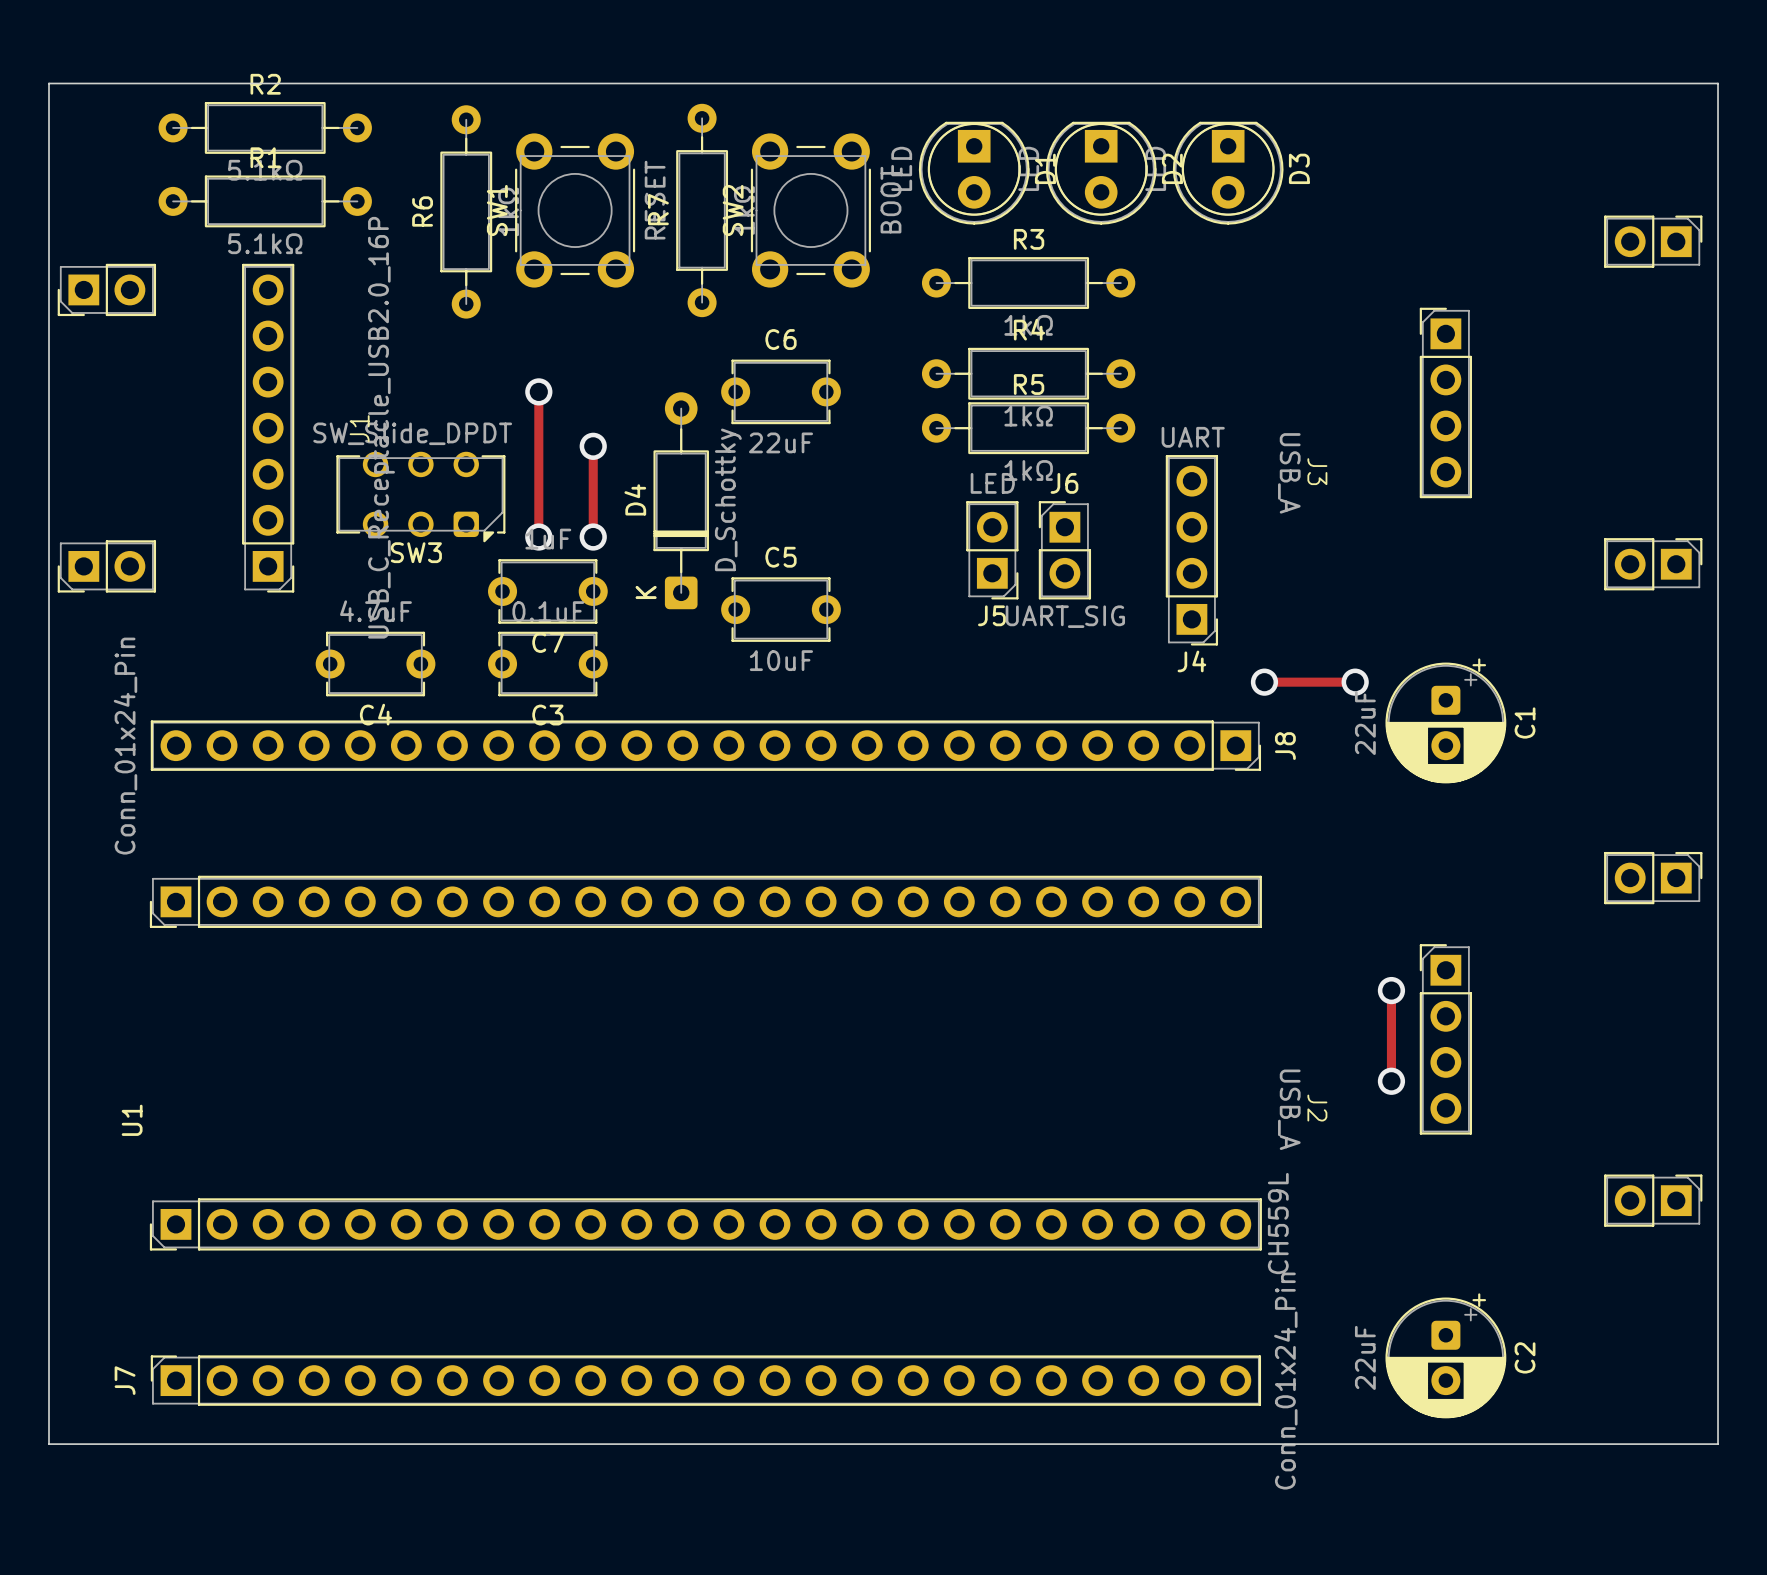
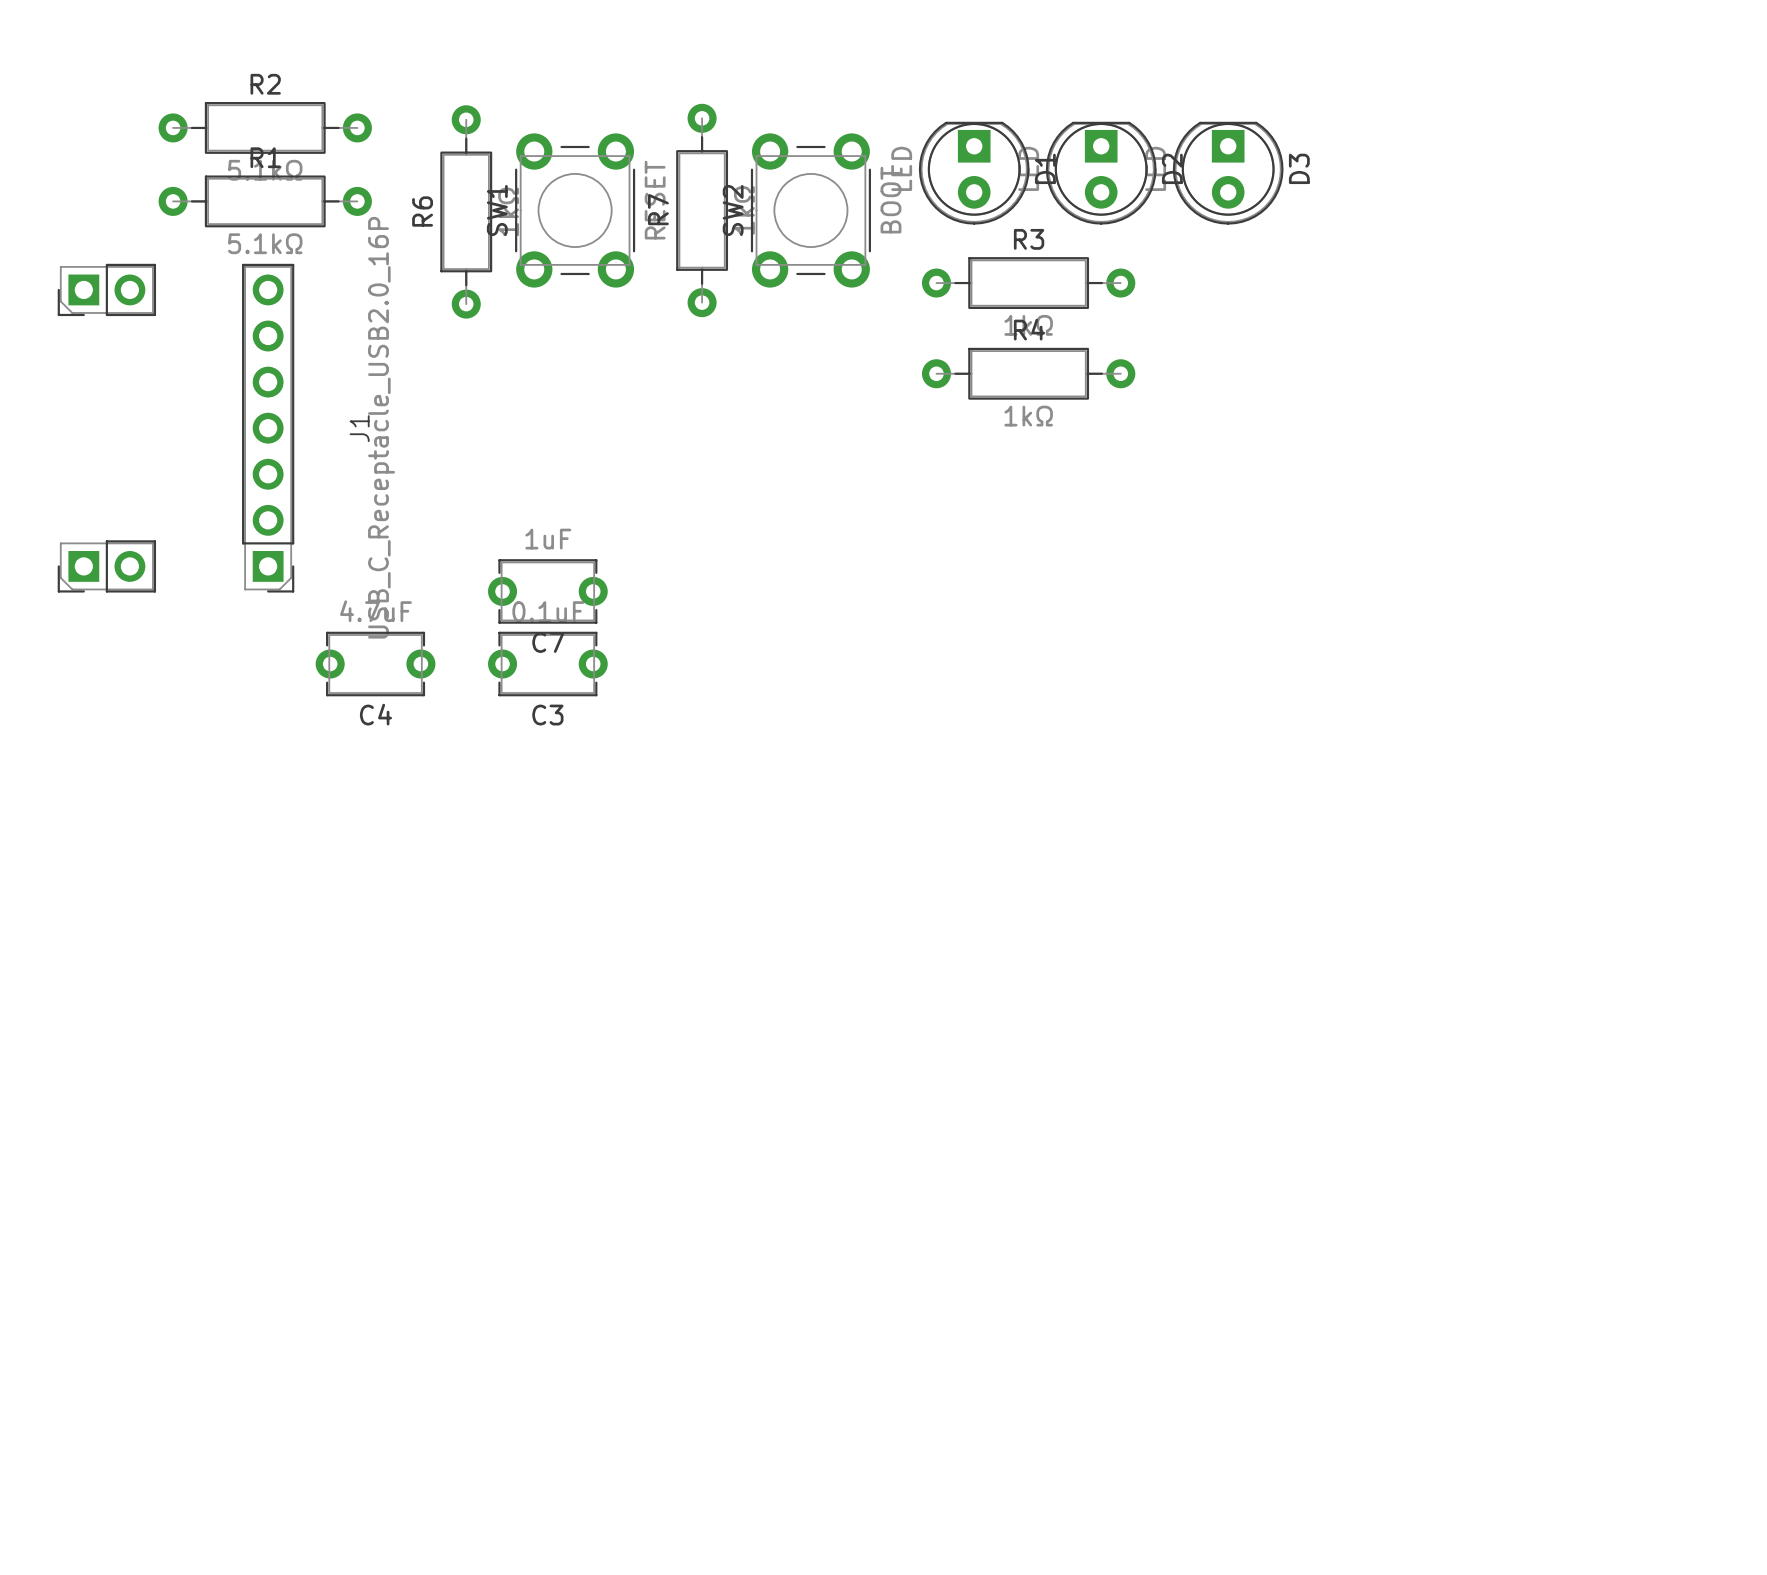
board edge: (49, 83) (1718, 83) (1718, 1444) (49, 1444) (49, 83) -> none
track: (538, 391) (538, 537) -> none
via: (538, 391) -> none
C6: 22uF (781, 391) -> none
J3: USB_A (1561, 402) -> none
R5: 1kΩ (1028, 428) -> none
track: (593, 446) (593, 537) -> none
via: (593, 446) -> none
SW3: SW_Slide_DPDT (420, 497) -> none
D4: D_Schottky (681, 500) -> none
via: (538, 537) -> none
via: (593, 537) -> none
J5: LED (992, 550) -> none
J6: UART_SIG (1064, 550) -> none
J4: UART (1191, 550) -> none
C5: 10uF (781, 609) -> none
track: (1264, 682) (1355, 682) -> none
via: (1264, 682) -> none
via: (1355, 682) -> none
C1: 22uF (1445, 720) -> none
J8: Conn_01x24_Pin (705, 745) -> none
track: (1391, 990) (1391, 1081) -> none
via: (1391, 990) -> none
J2: USB_A (1561, 1039) -> none
U1: CH559L (705, 1063) -> none
via: (1391, 1081) -> none
C2: 22uF (1445, 1355) -> none
J7: Conn_01x24_Pin (705, 1380) -> none

